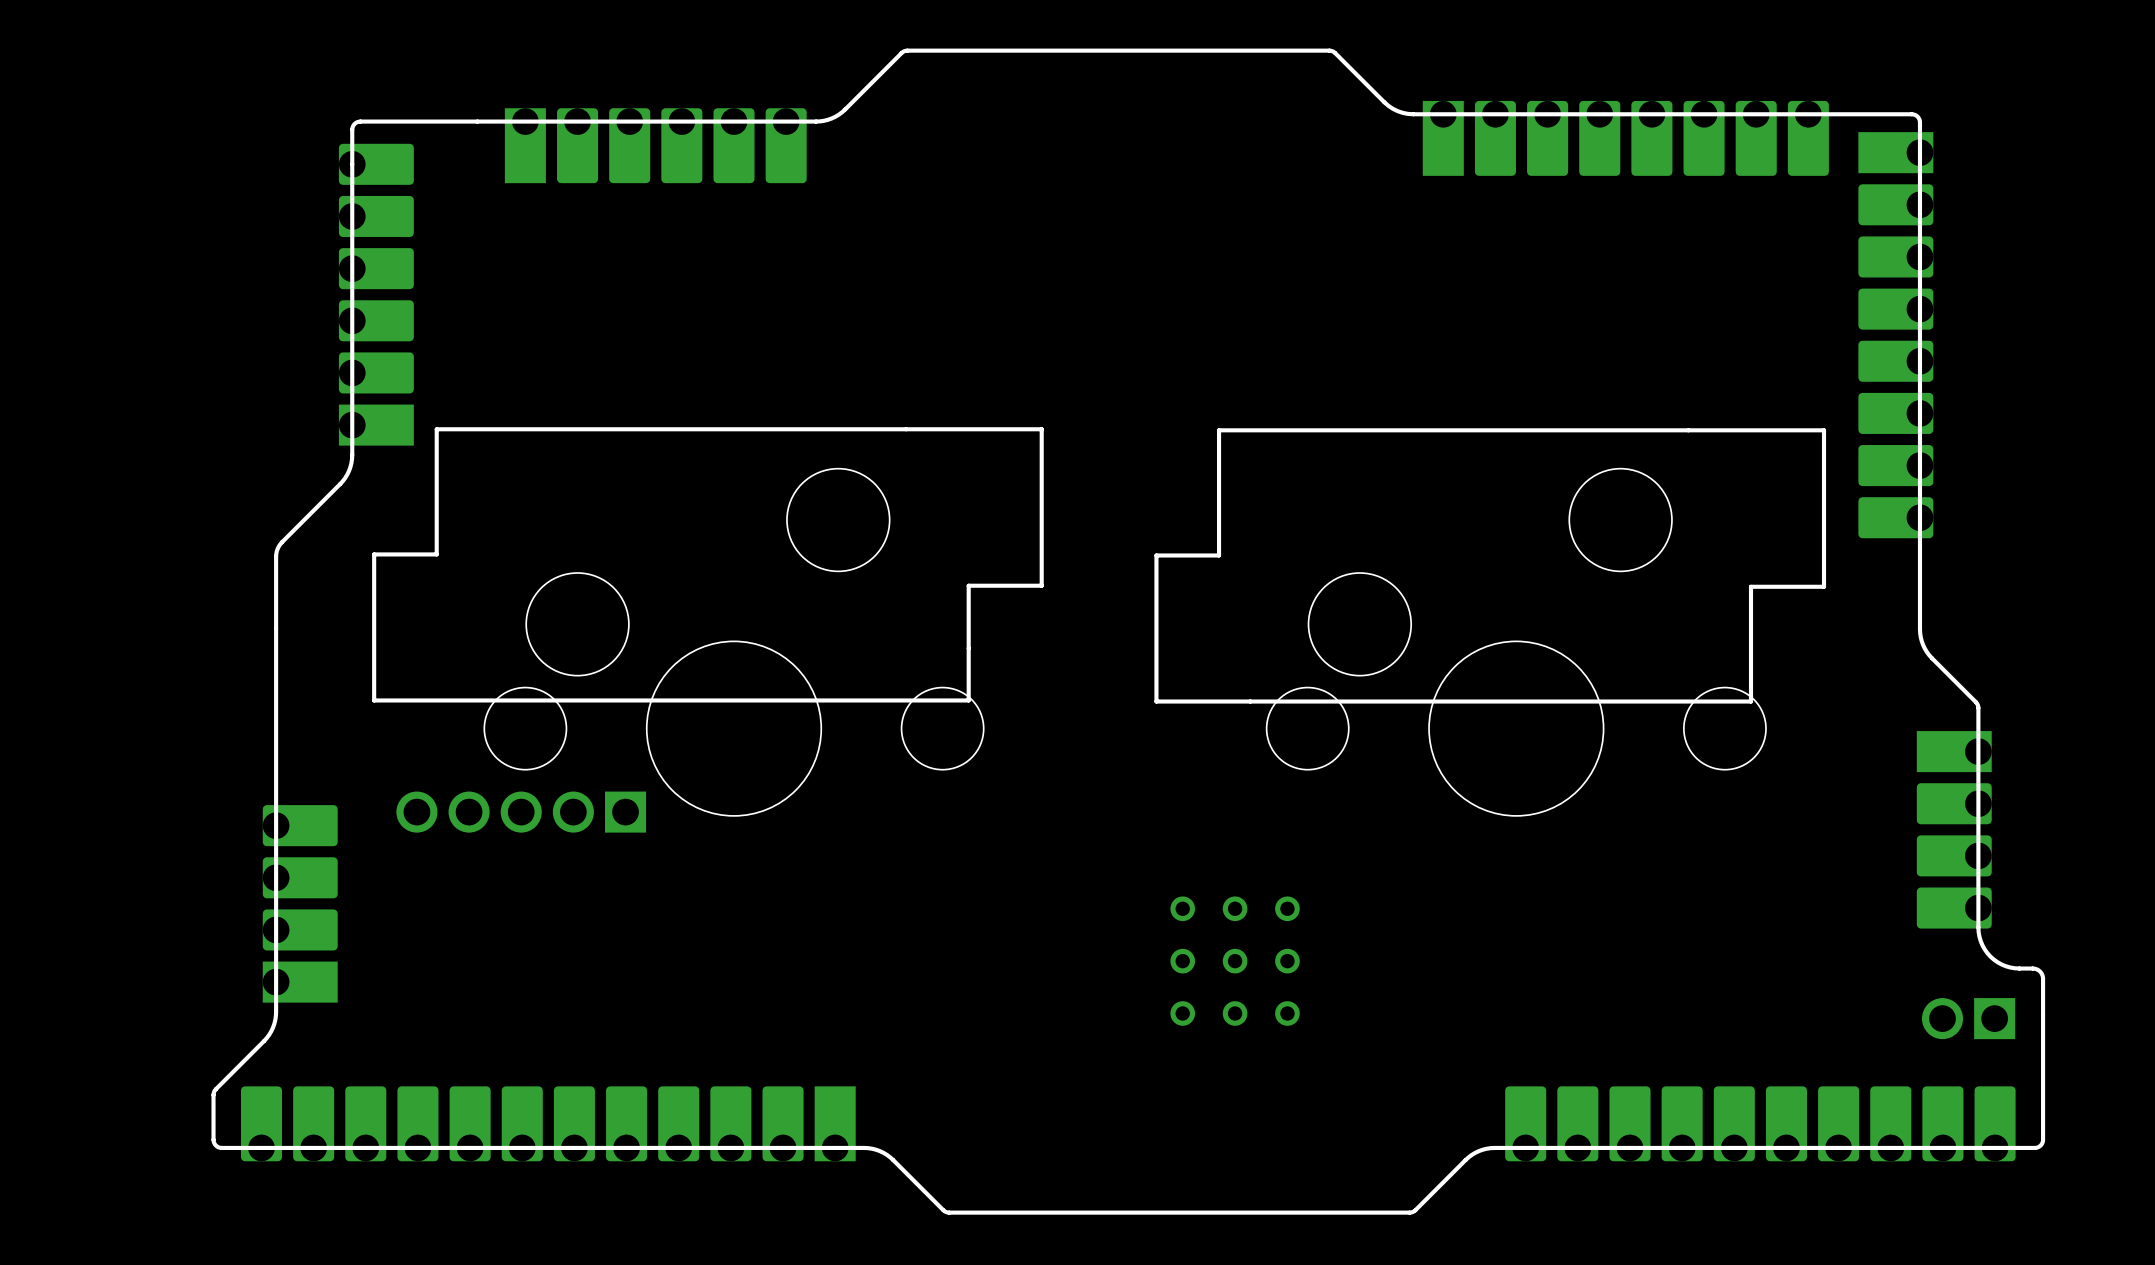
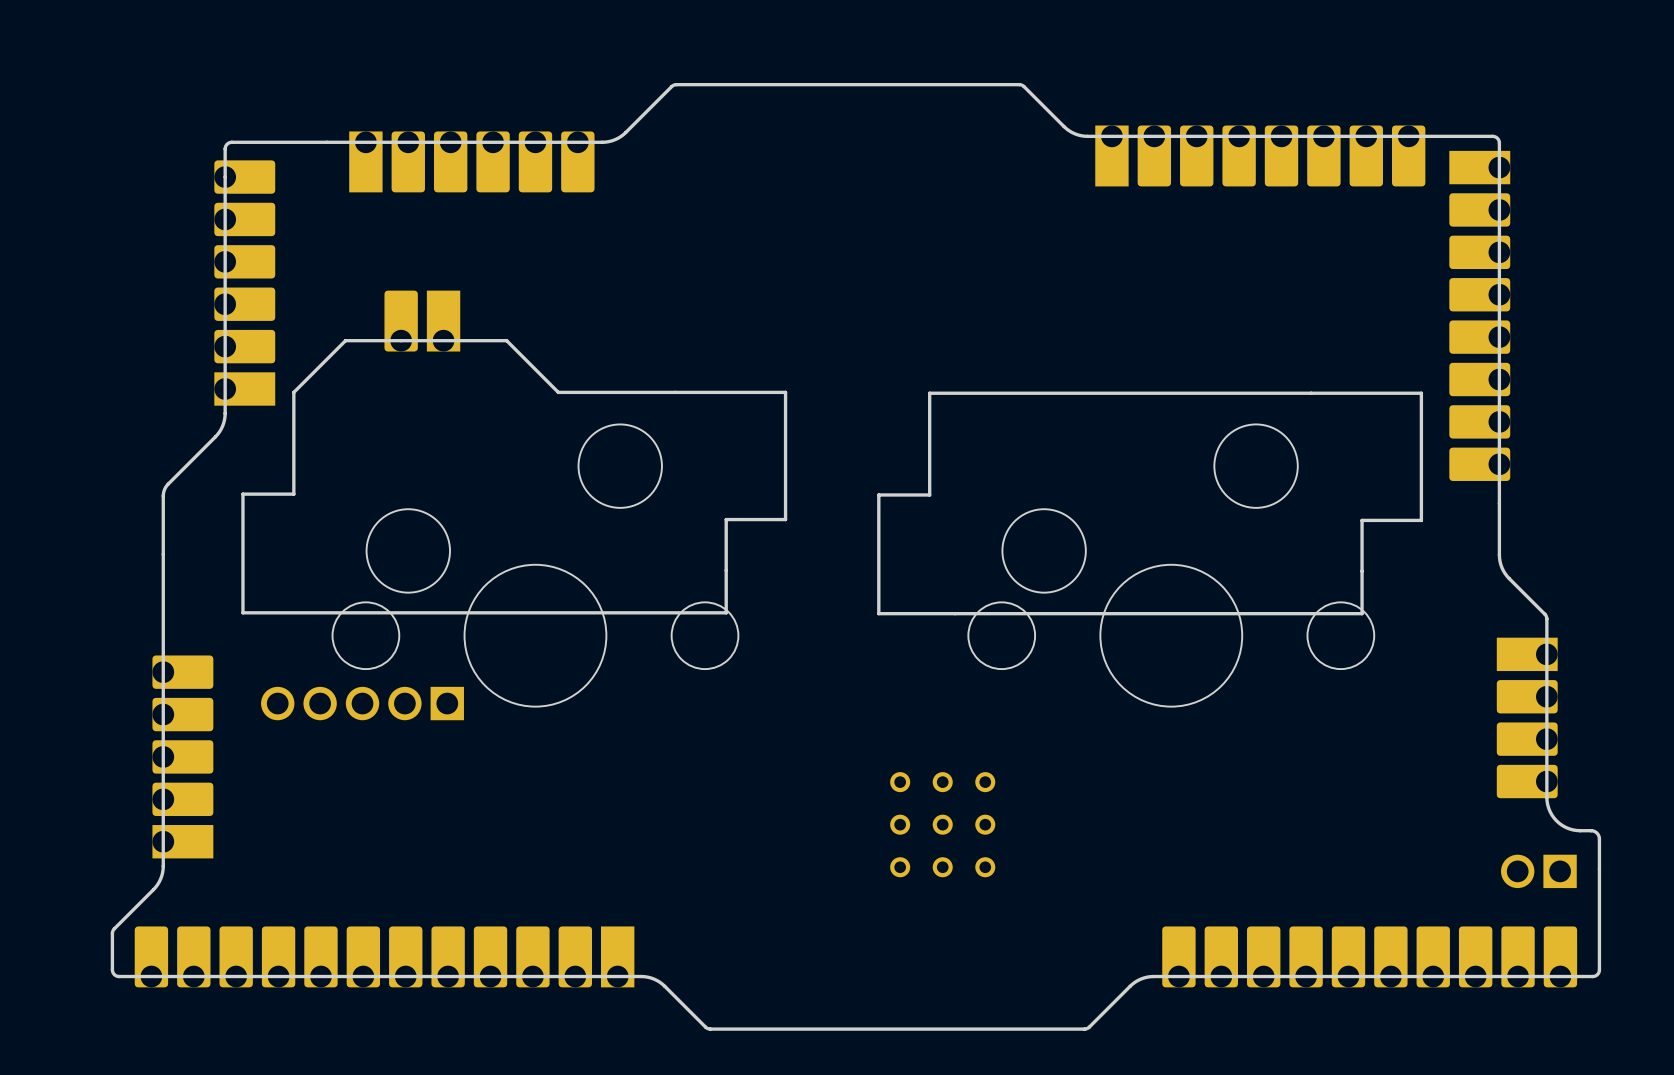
part: none -> (422, 321)
board edge: (762, 429) (436, 429) -> (558, 392) (506, 340) (345, 340) (293, 392)
part footprint: [262, 805, 338, 1003] -> [152, 655, 214, 859]

